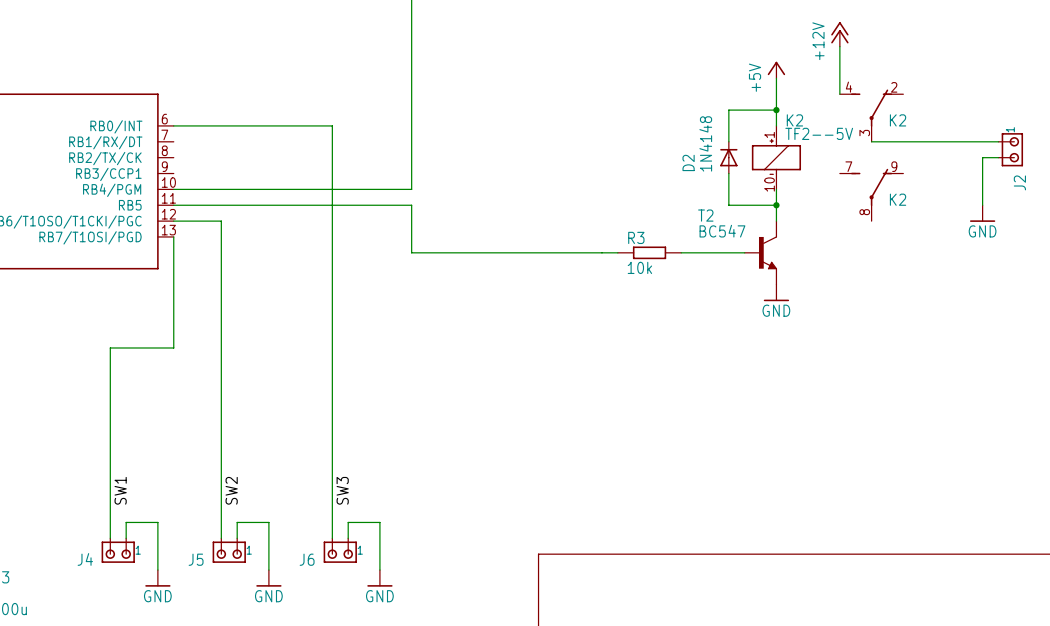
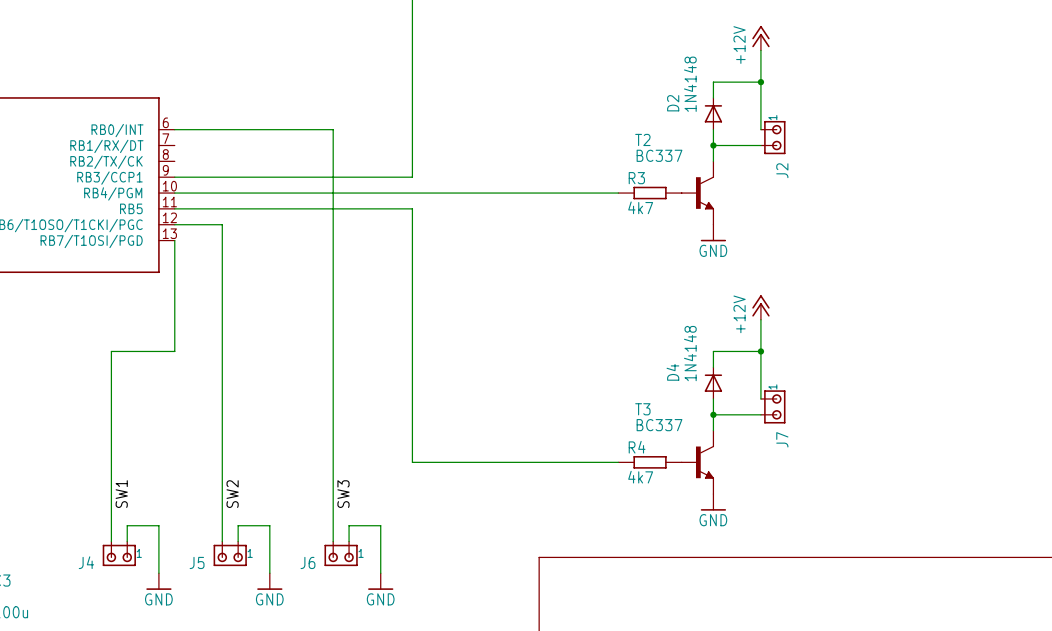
power symbol position: +12V (839, 34) -> +12V (760, 38)
wire: none -> (760, 50) (760, 129)
wire: (839, 46) (839, 94) -> none
power symbol: +5V (776, 70) -> none
wire: none -> (760, 82) (713, 82) (713, 97)
junction: none -> (760, 82)
wire: (776, 78) (776, 125) -> none
wire: (776, 110) (728, 110) (728, 141) -> none
junction: (776, 110) -> none
K2: (871, 115) -> none
wire: none -> (713, 145) (760, 145)
junction: none -> (713, 145)
wire: (871, 141) (998, 141) -> none
D2 value position: 1N4148 (705, 143) -> 1N4148 (690, 84)
J2 position: (1010, 149) -> (773, 137)
D2 position: (728, 157) -> (713, 113)
K2: TF2--5V (776, 157) -> none
wire: (998, 157) (982, 157) (982, 205) -> none
D2 name position: D2 (688, 162) -> D2 (673, 103)
wire: none -> (174, 177) (412, 177)
wire: (411, 173) (411, 189) -> (618, 193) (412, 193)
wire: (728, 173) (728, 205) (776, 205) -> none
wire: (776, 189) (776, 221) -> (713, 129) (713, 161)
K2: (871, 194) -> none
junction: (776, 205) -> none
power symbol: GND (982, 213) -> none
T2 name position: T2 (705, 215) -> T2 (642, 139)
T2 value: BC547 (722, 231) -> BC337 (659, 155)
wire: (411, 252) (617, 252) -> (412, 256) (412, 462) (618, 462)
R3 position: (649, 252) -> (650, 193)
wire: (681, 252) (744, 252) -> none
T2 position: (760, 252) -> (697, 193)
R3 value: 10k (639, 267) -> 4k7 (640, 207)
power symbol position: GND (776, 292) -> GND (713, 233)
power symbol: none -> +12V (760, 307)
wire: none -> (760, 319) (760, 398)
wire: none -> (760, 351) (713, 351) (713, 367)
junction: none -> (760, 351)
D4: none -> 1N4148 (713, 383)
wire: none -> (713, 398) (713, 430)
J7: none -> (773, 406)
wire: none -> (713, 414) (760, 414)
junction: none -> (713, 414)
R4: none -> 4k7 (650, 462)
T3: none -> BC337 (697, 462)
power symbol: none -> GND (713, 502)

